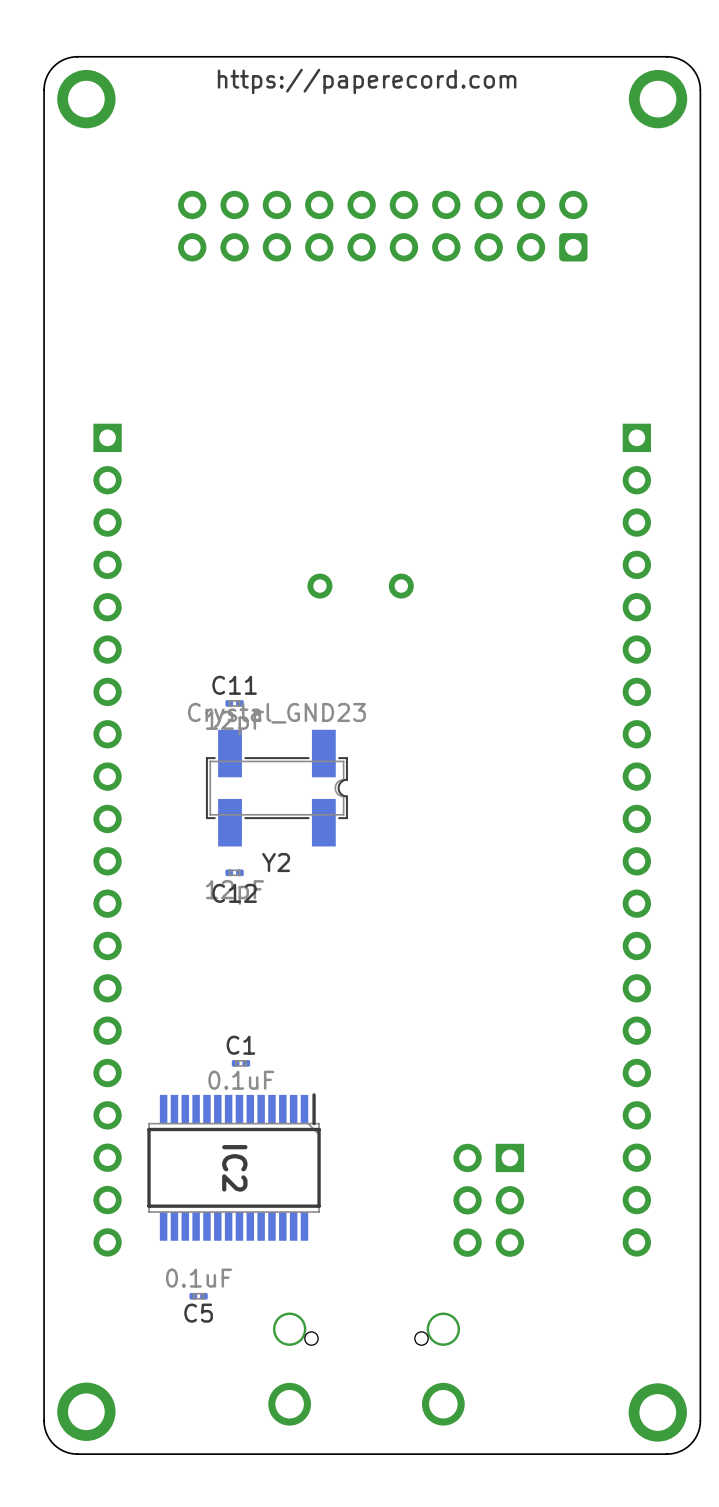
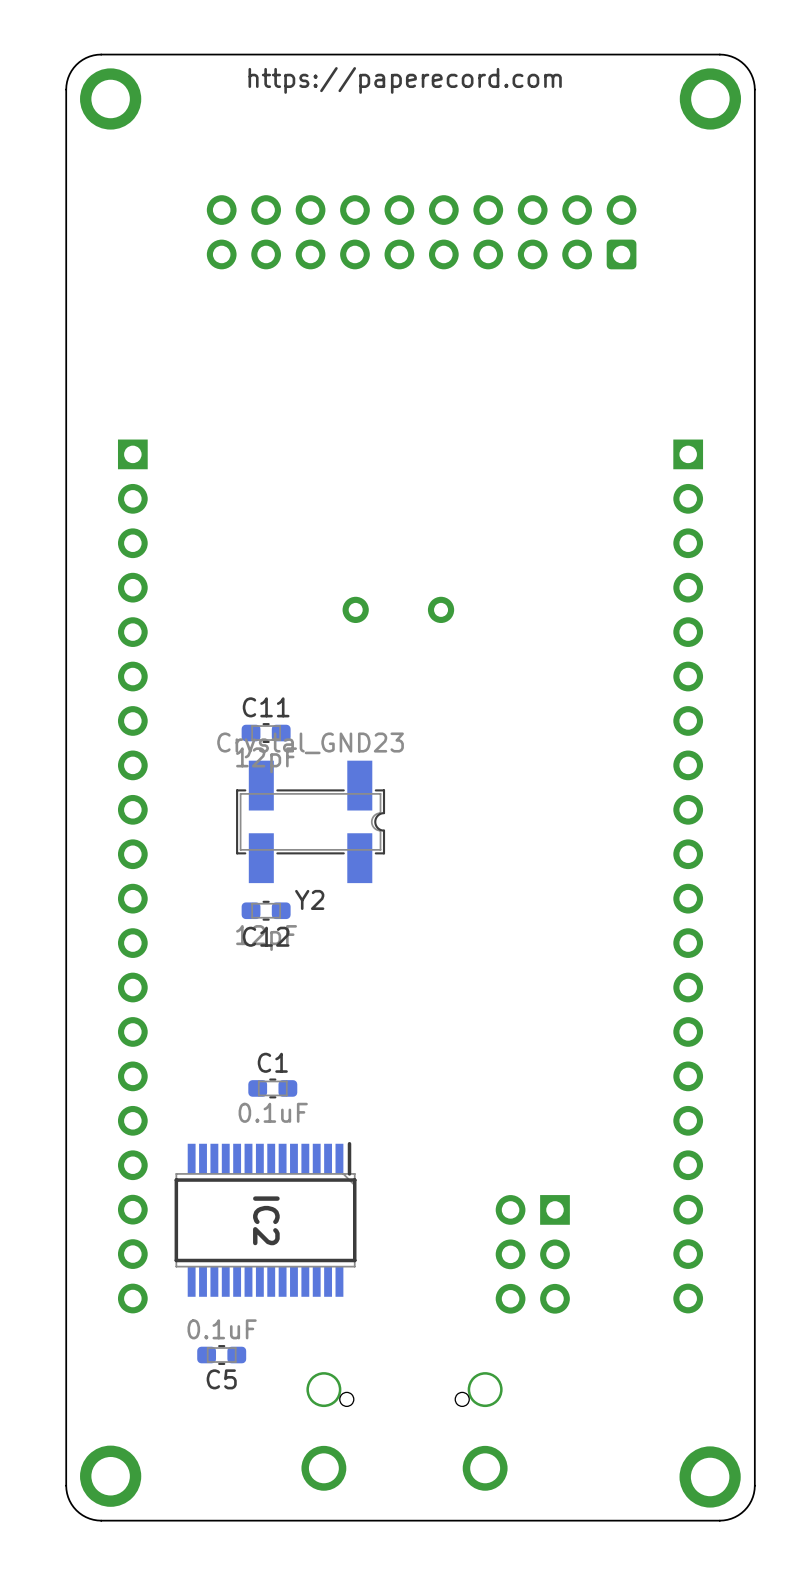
C11 footprint: [225, 700, 244, 707] -> [241, 723, 291, 744]
C12 footprint: [225, 869, 244, 877] -> [241, 900, 291, 921]
C1 footprint: [231, 1060, 251, 1067] -> [248, 1078, 298, 1099]
C5 footprint: [189, 1292, 208, 1300] -> [197, 1345, 247, 1365]

